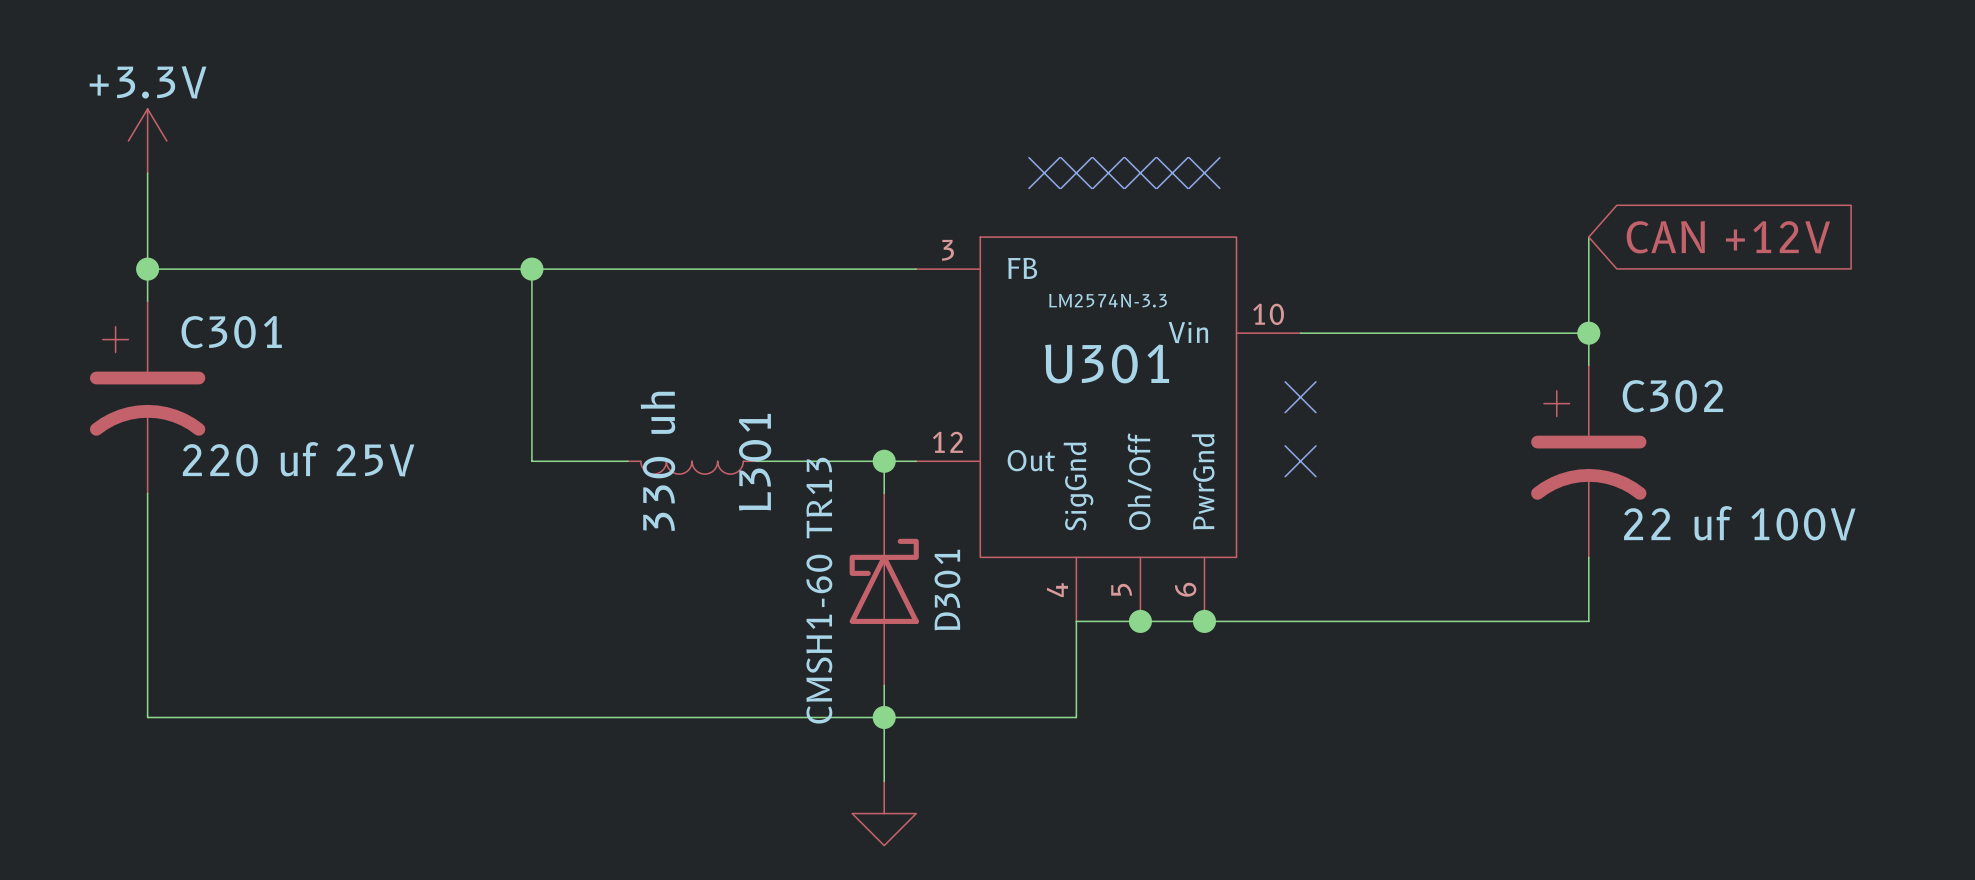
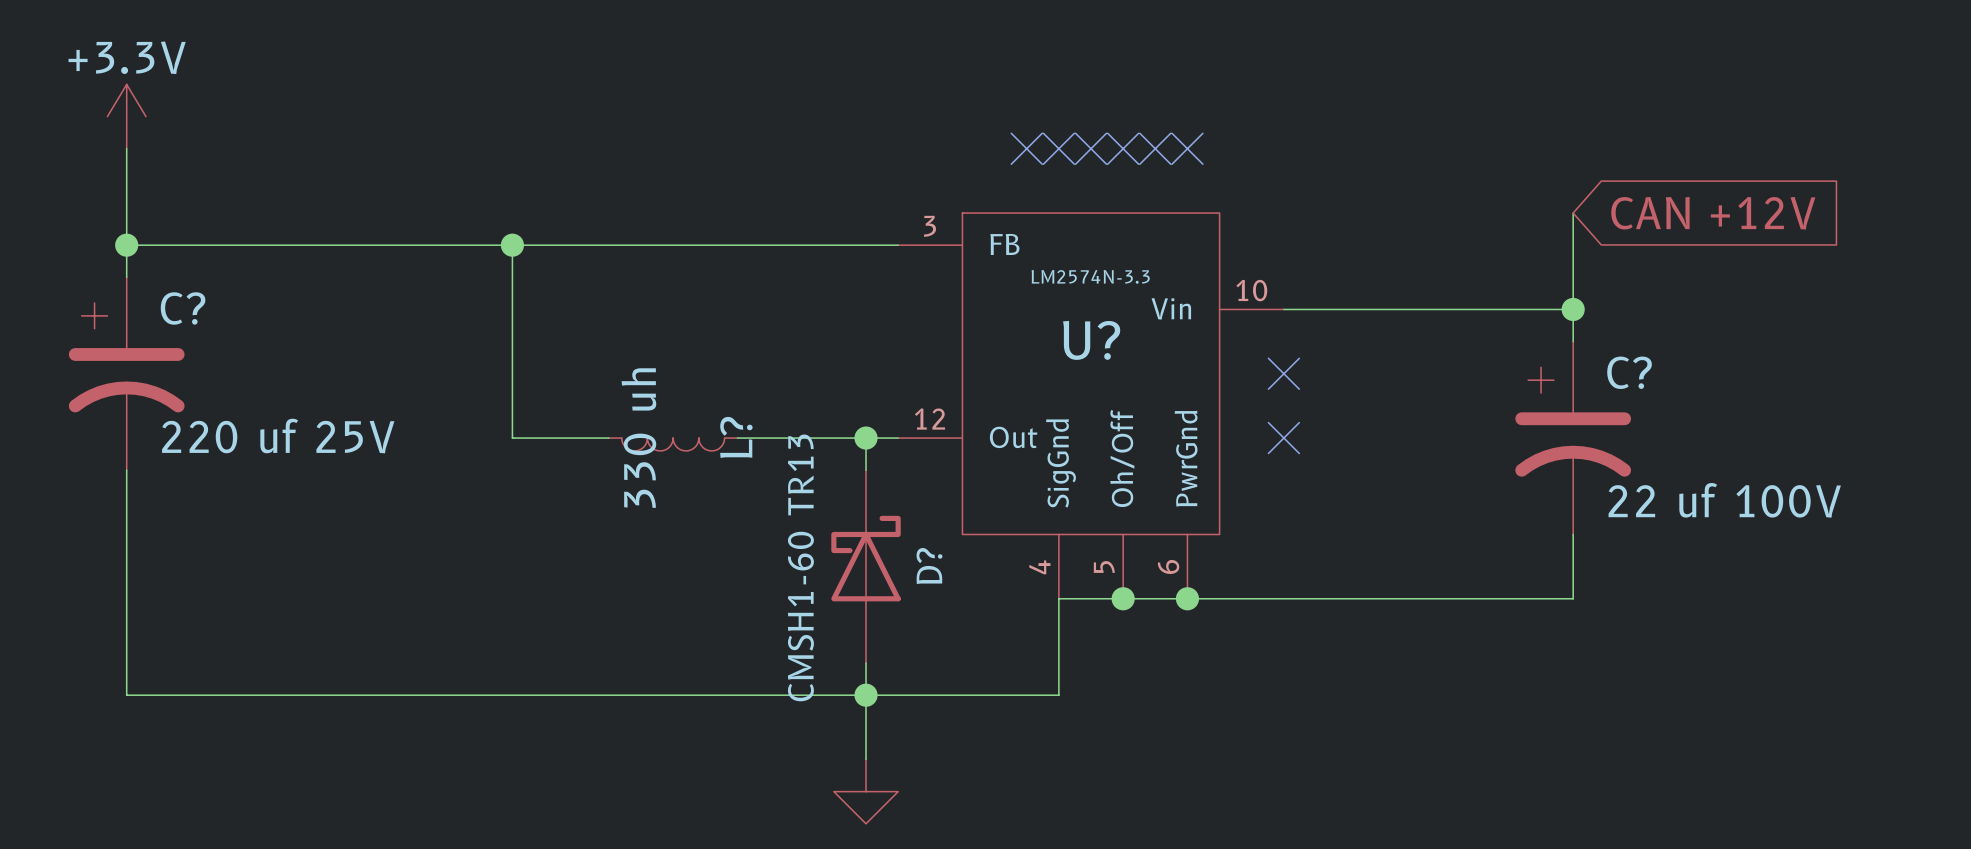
C301 name: C301 (231, 332) -> C? (183, 308)
U301 name: U301 (1107, 363) -> U? (1091, 340)
C302 name: C302 (1672, 396) -> C? (1629, 372)
L301 name: L301 (755, 462) -> L? (736, 437)
D301 name: D301 (947, 590) -> D? (929, 566)

